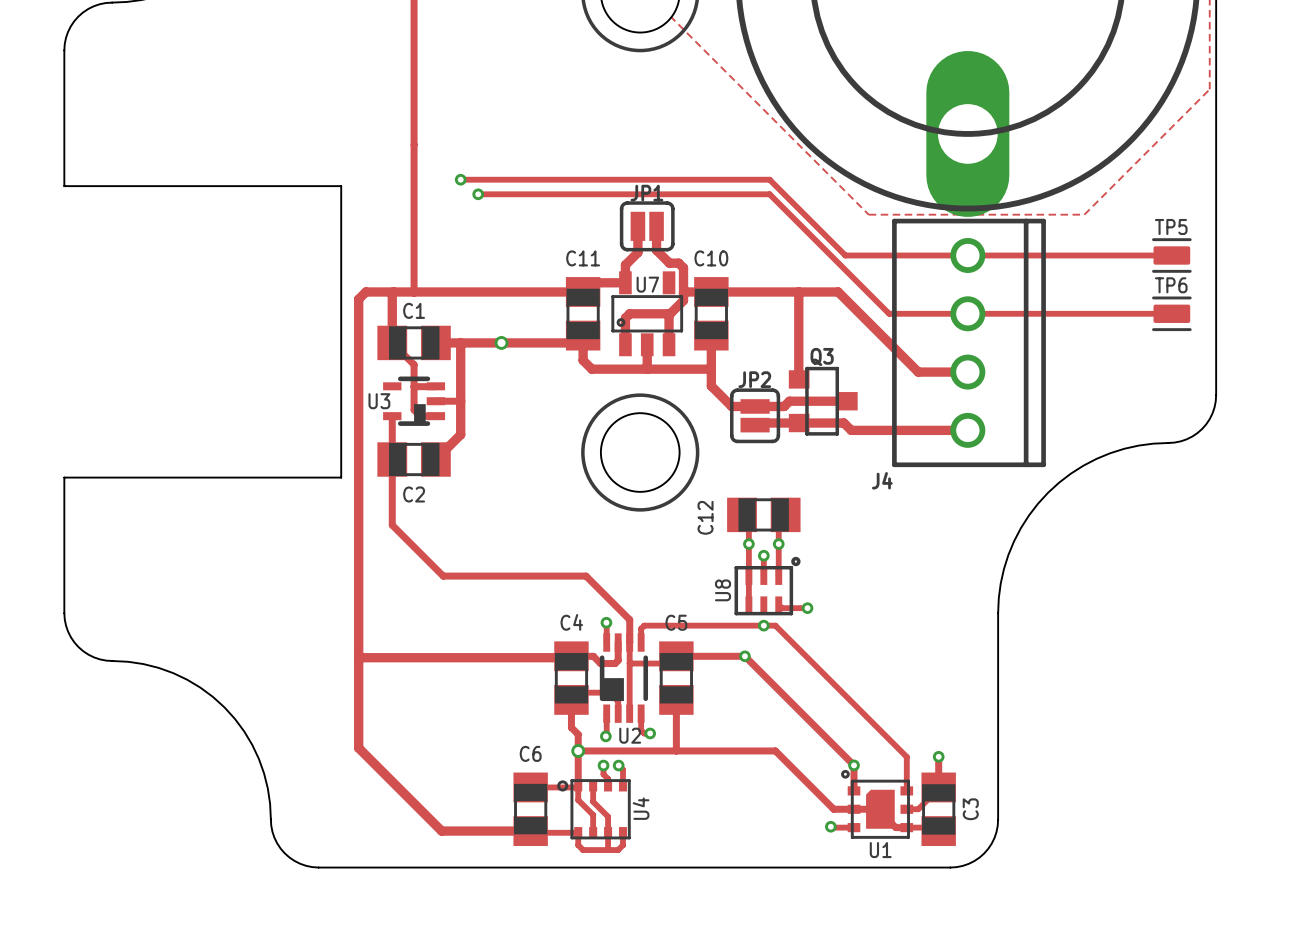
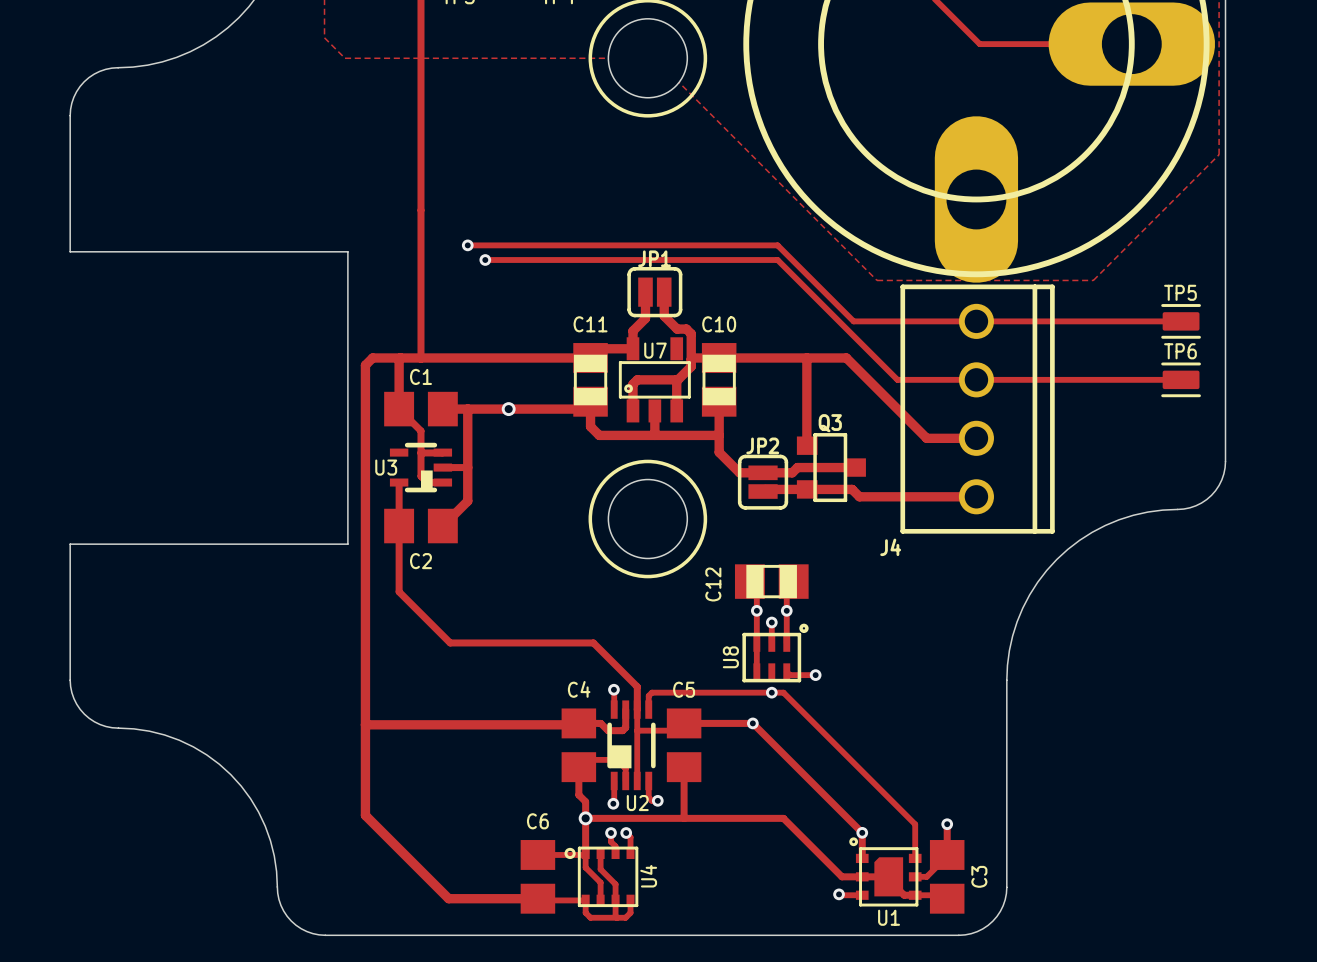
C1 footprint: [377, 325, 451, 361] -> [384, 391, 458, 427]
C2 footprint: [377, 442, 451, 477] -> [384, 508, 458, 544]
C4 footprint: [554, 641, 589, 715] -> [561, 708, 597, 783]
C5 footprint: [659, 641, 694, 715] -> [666, 708, 702, 783]
C6 footprint: [513, 772, 548, 846] -> [520, 840, 556, 914]
C3 footprint: [921, 772, 956, 846] -> [929, 840, 965, 914]

